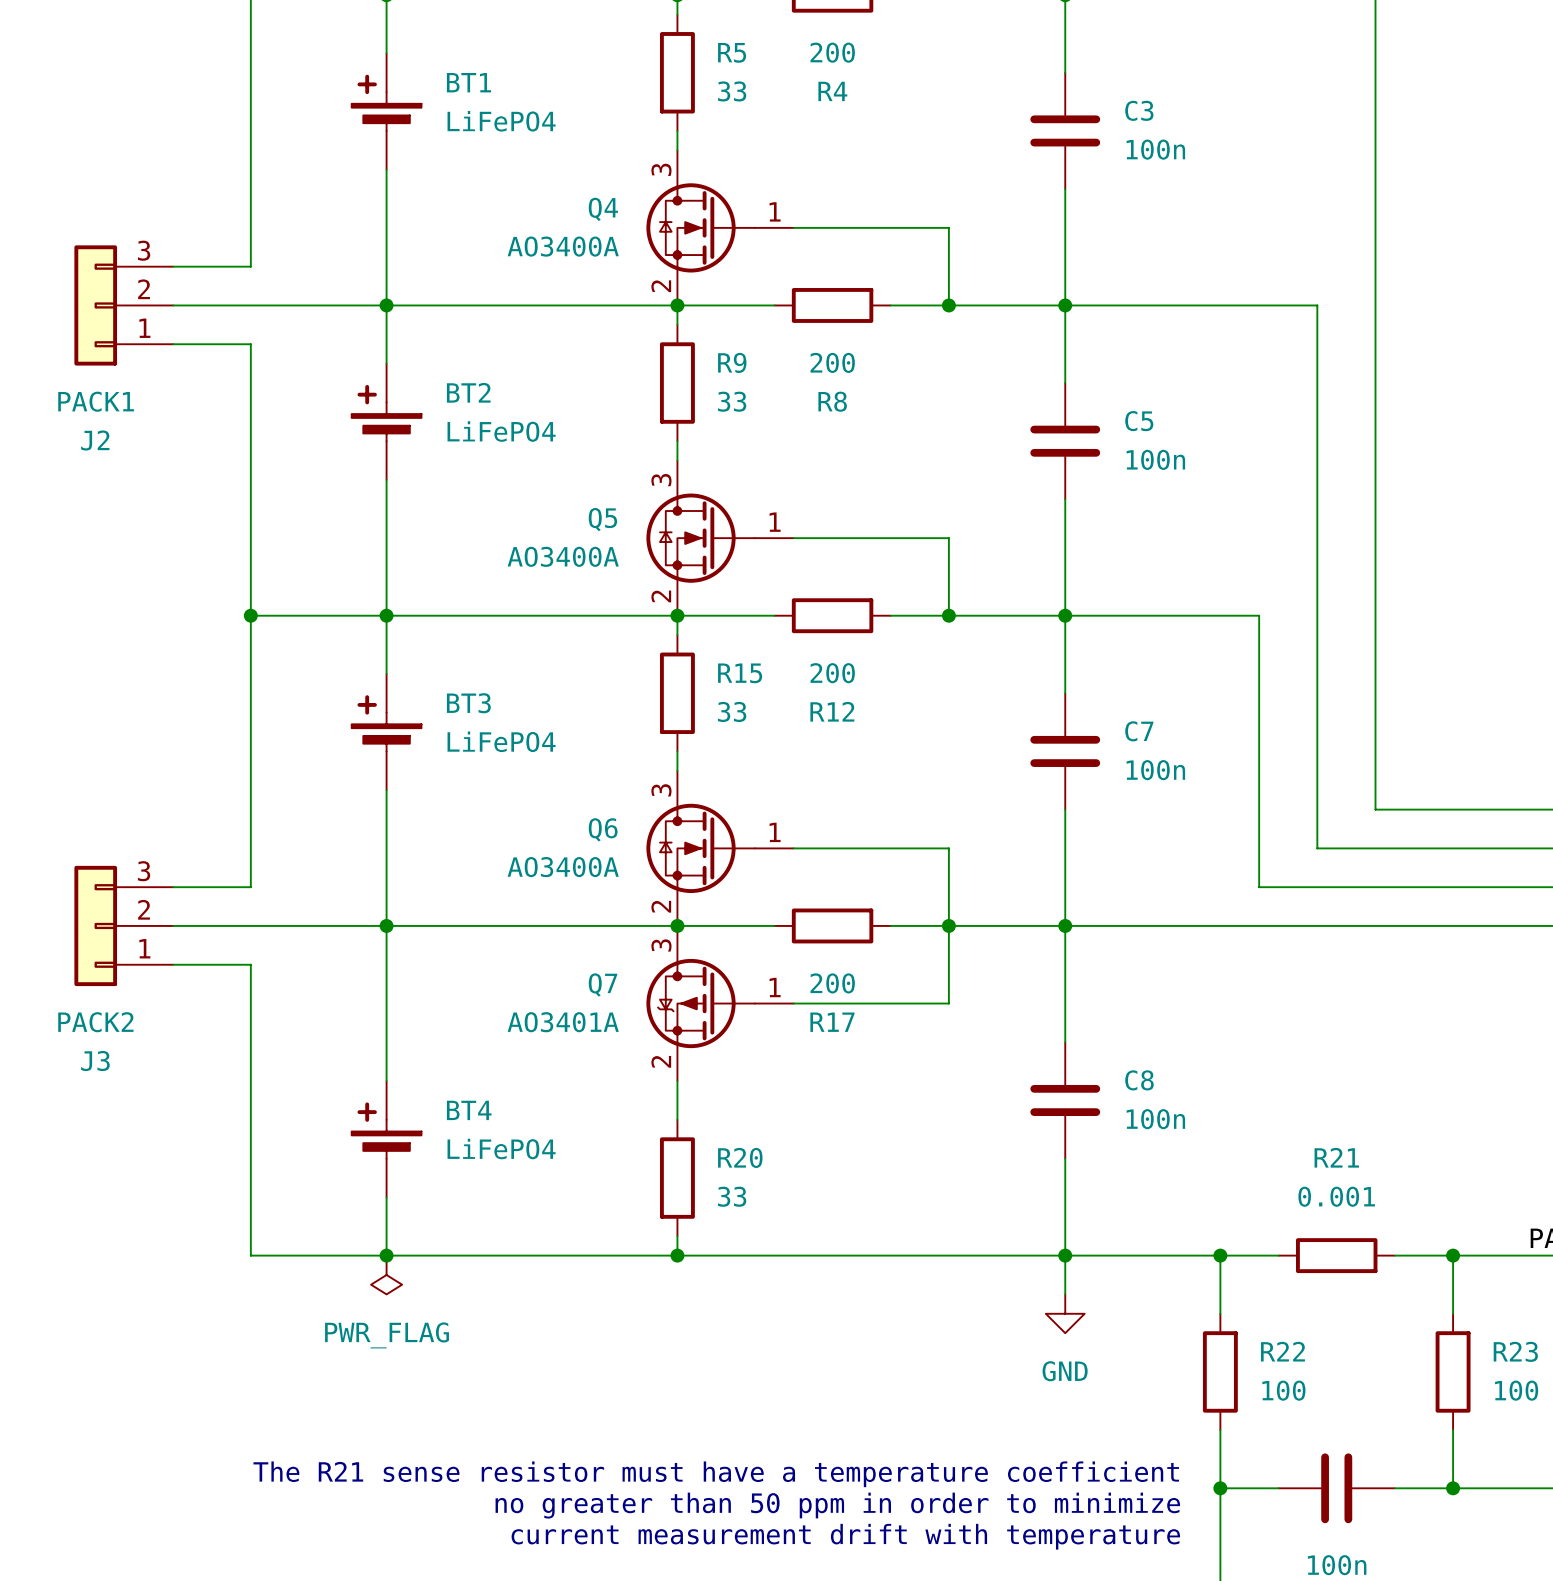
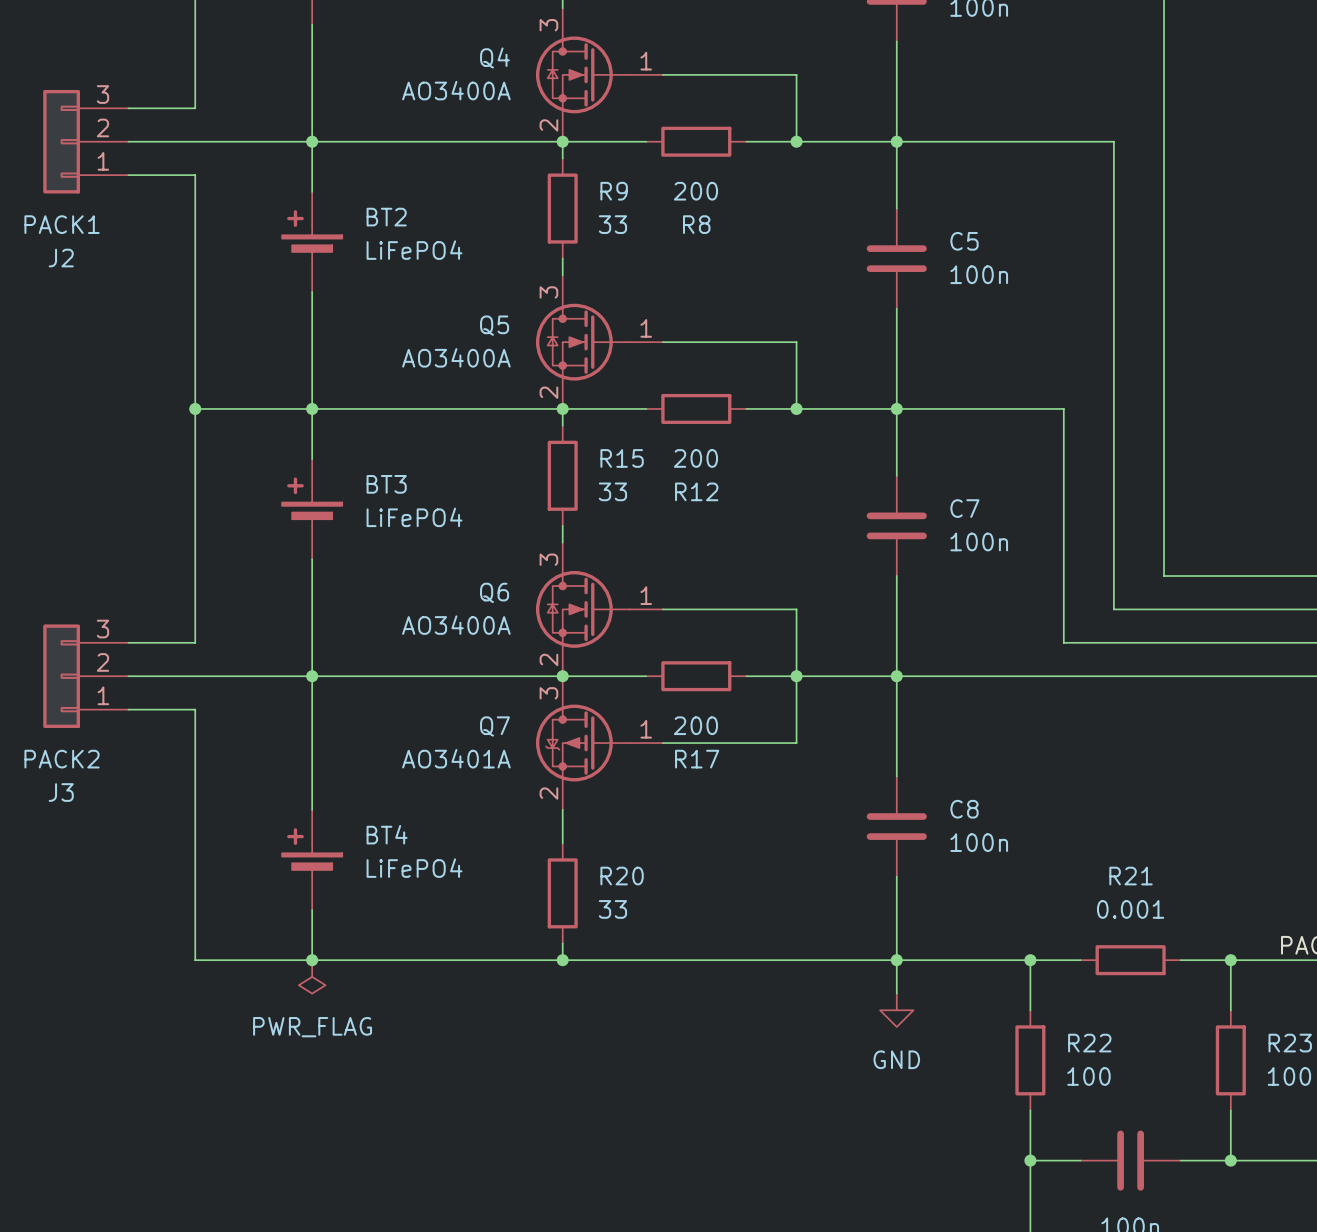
text: The R21 sense resistor must have a temperature coefficient (716, 1474) -> none
text: no greater than 50 ppm in order to minimize (837, 1505) -> none
text: current measurement drift with temperature (845, 1536) -> none

